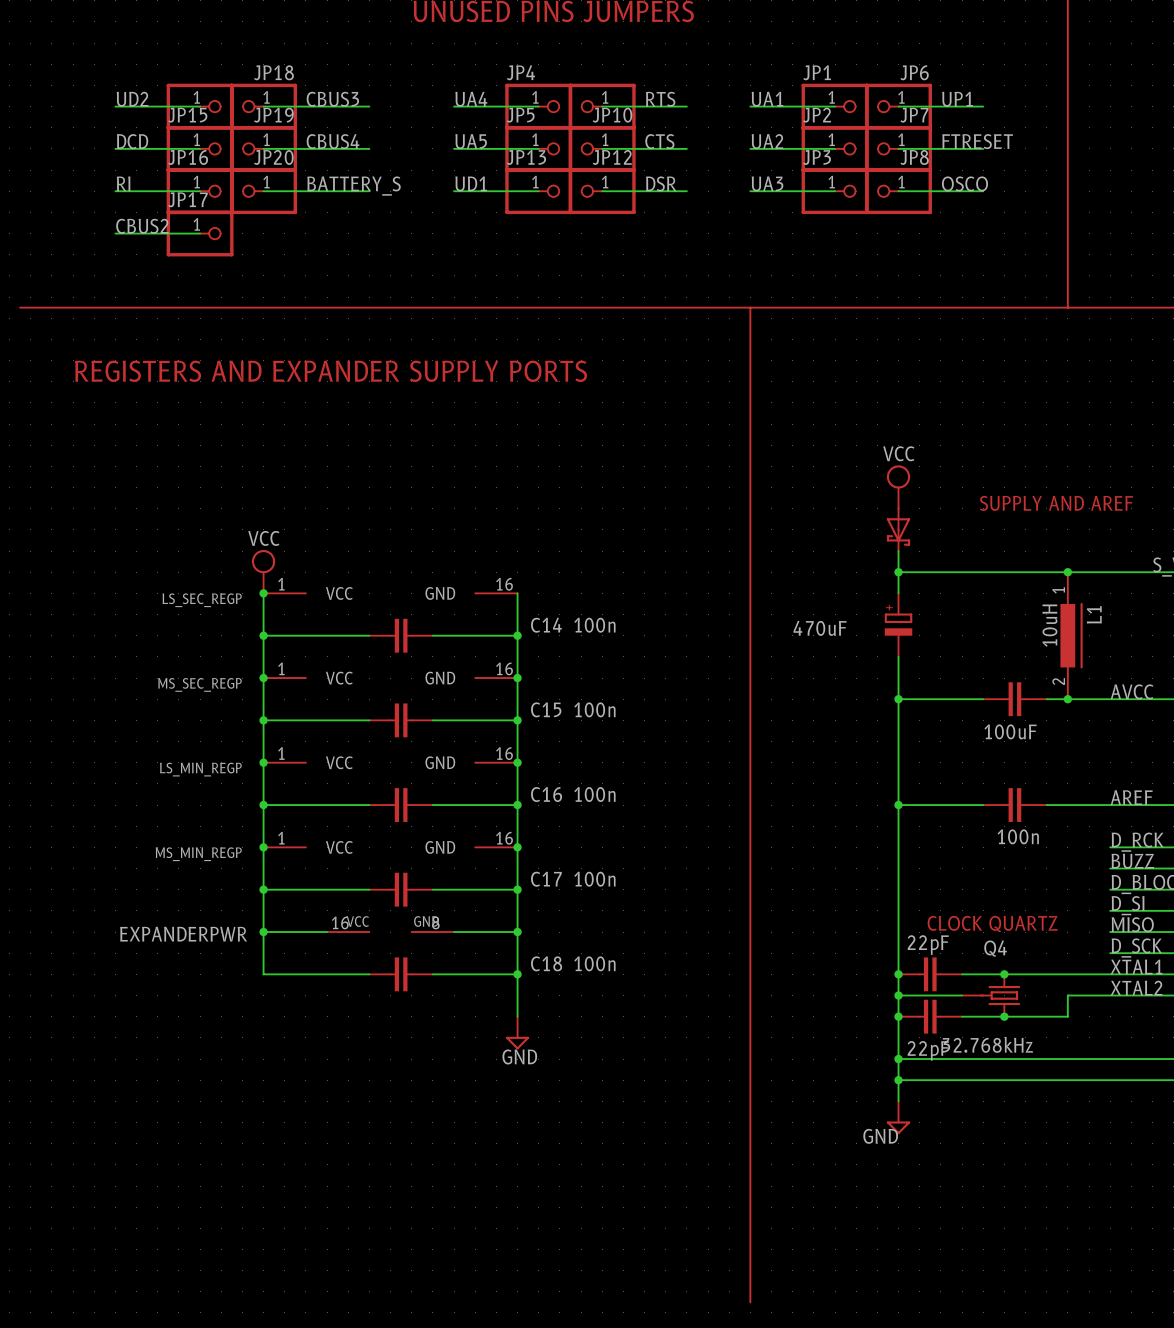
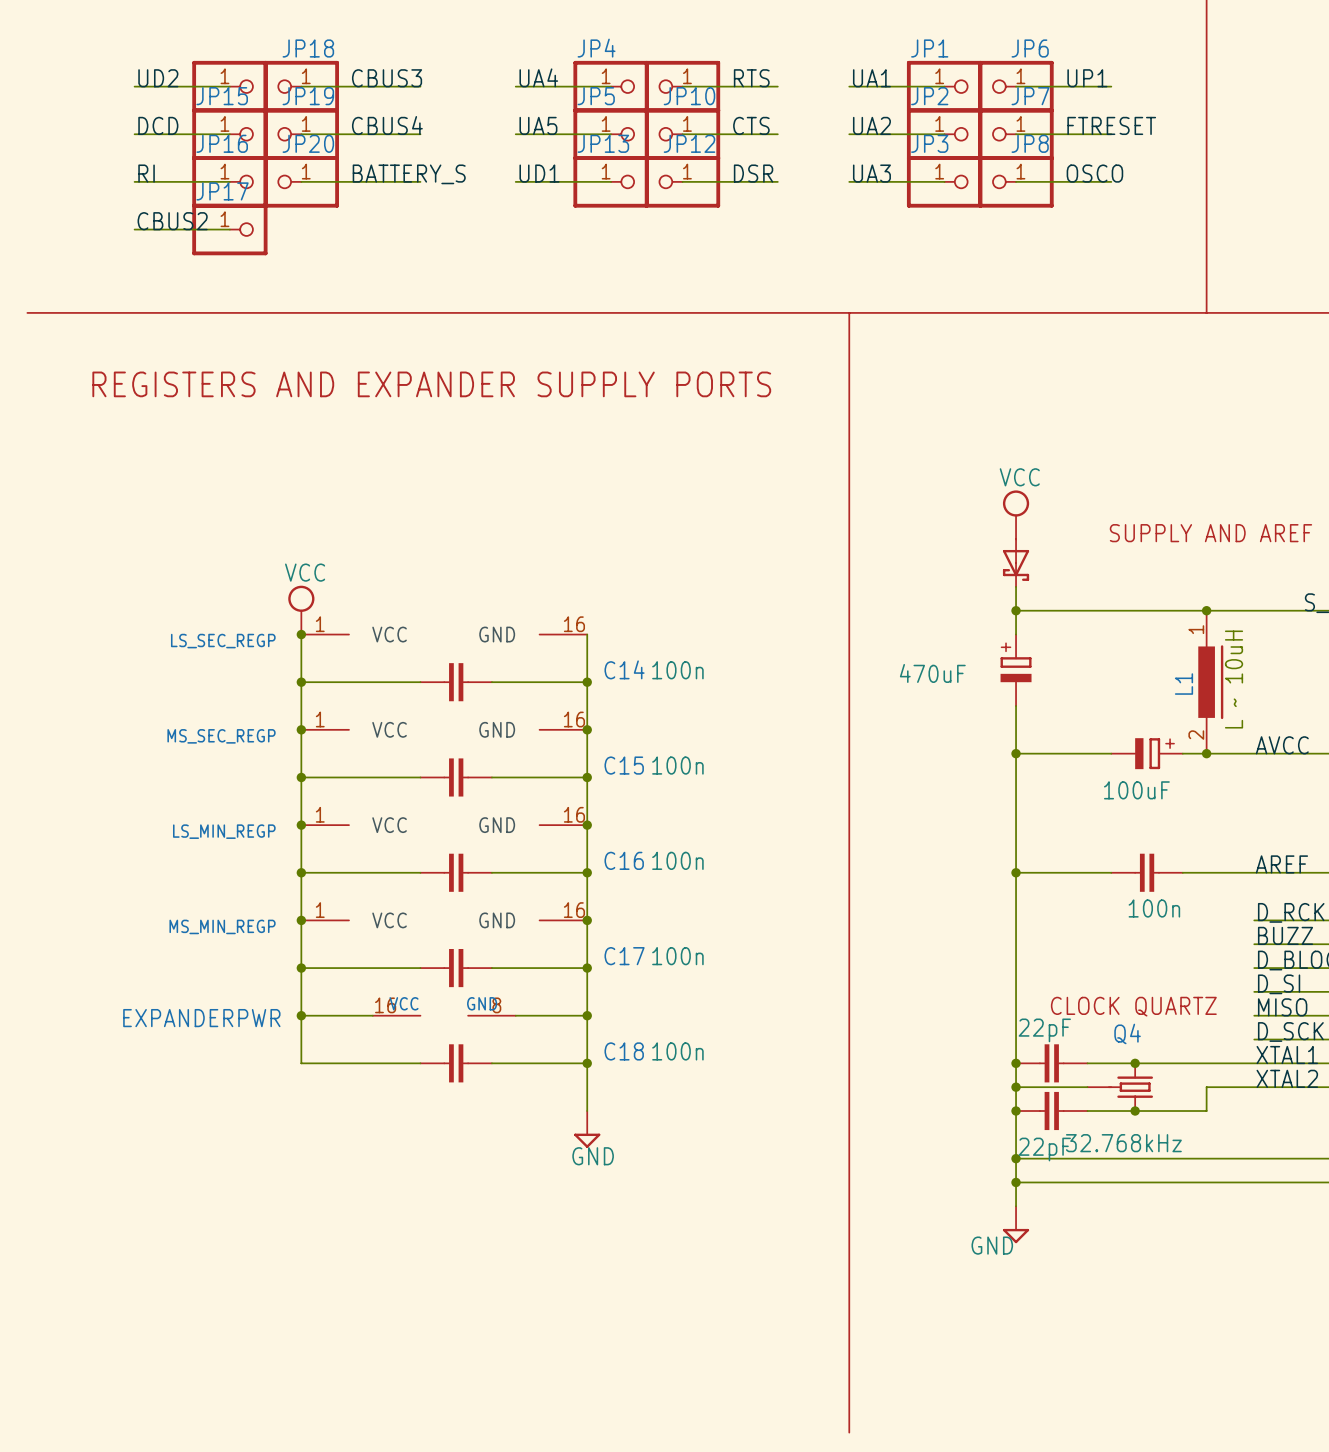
L1 name position: L1 (1094, 614) -> L1 (1183, 684)
L1 value: 10uH (1049, 625) -> none
text: none -> L ~ 10uH (1234, 679)
part symbol: [983, 682, 1047, 717] -> [1111, 738, 1183, 770]

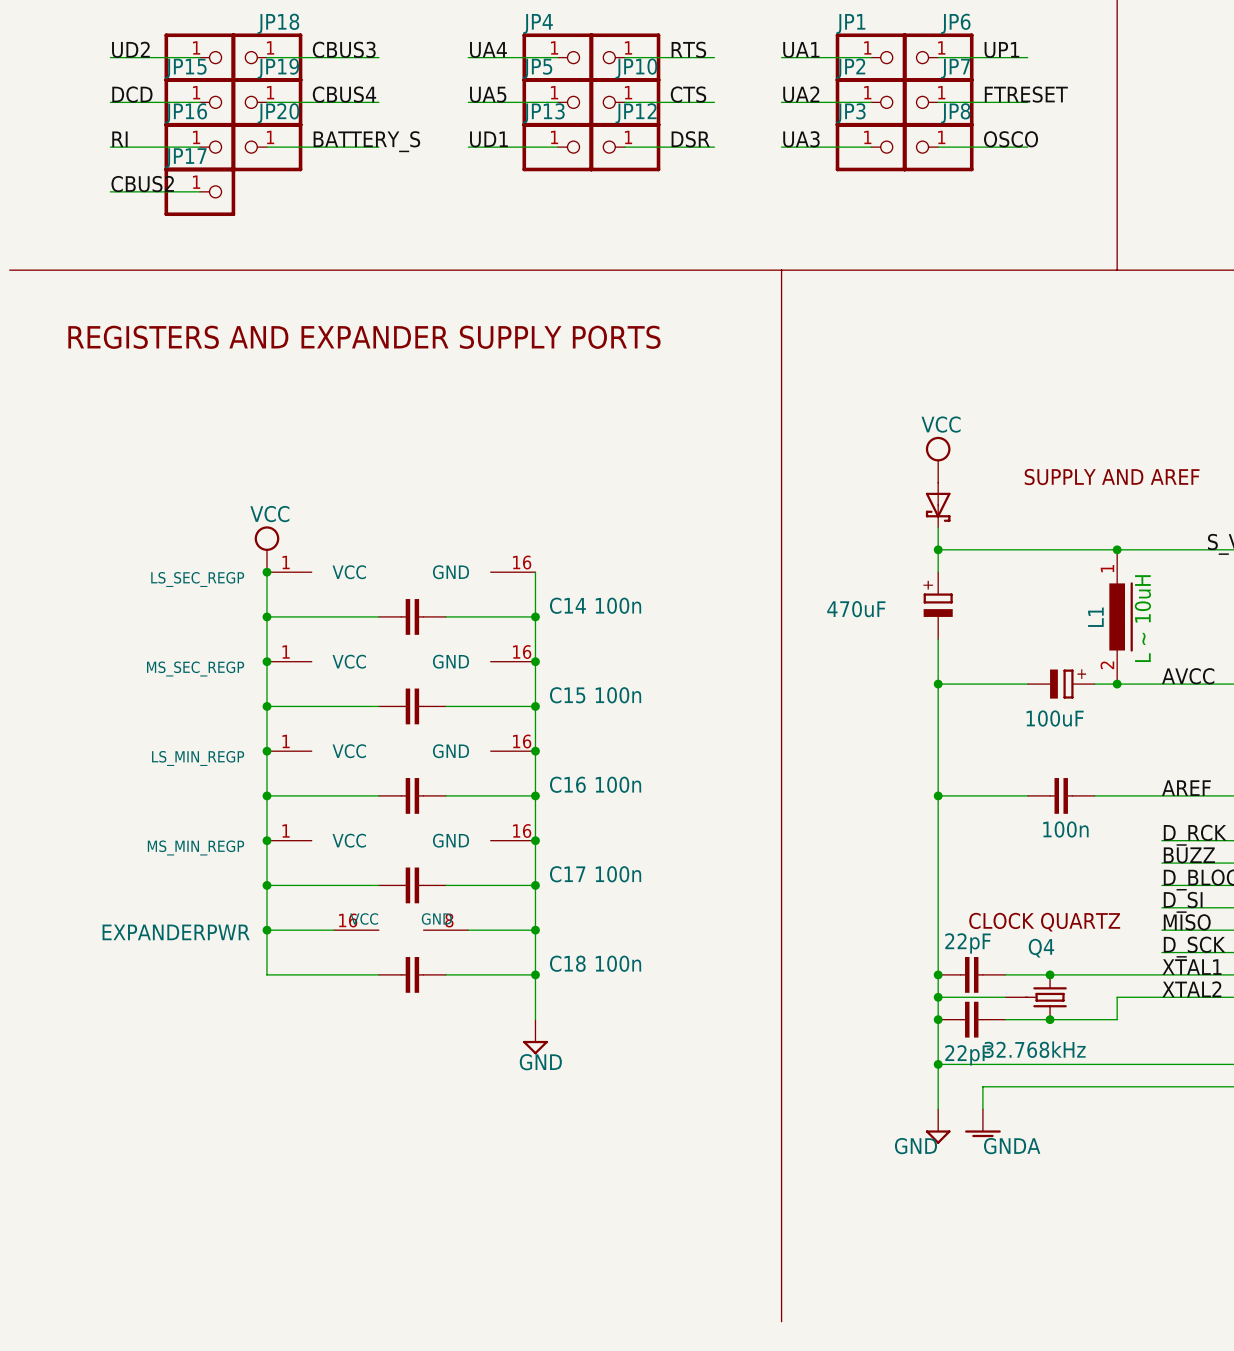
wire: (1016, 1182) (1063, 1182) -> (982, 1109) (982, 1086)
junction: (1016, 1182) -> none
power symbol: none -> GNDA (982, 1123)

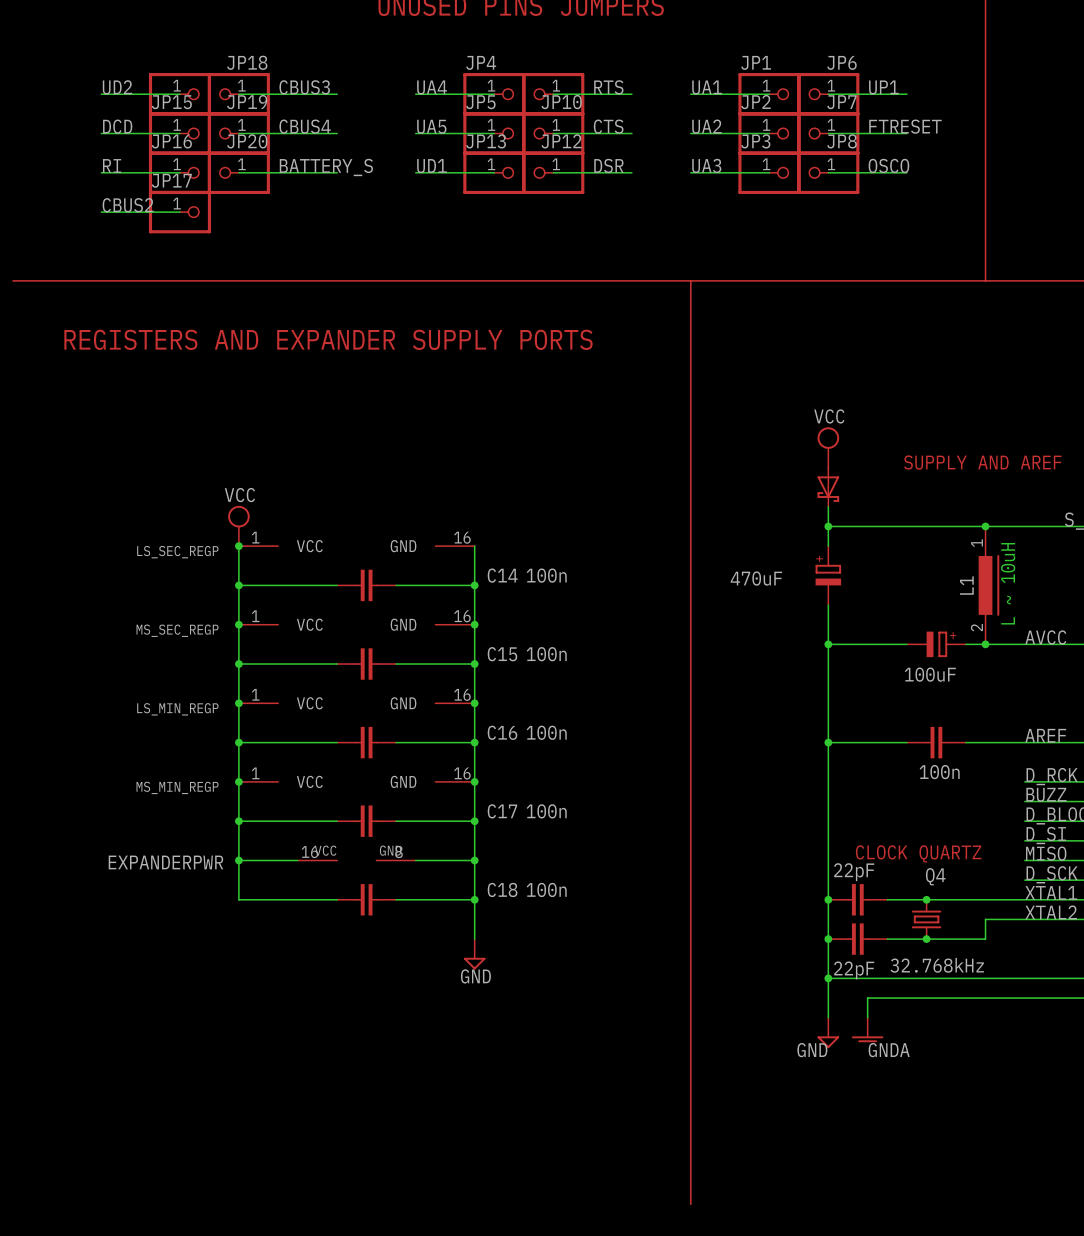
Q4 symbol: [1005, 974, 1067, 1021] -> [911, 899, 942, 940]
wire: (938, 997) (1005, 997) -> none
junction: (938, 997) -> none

